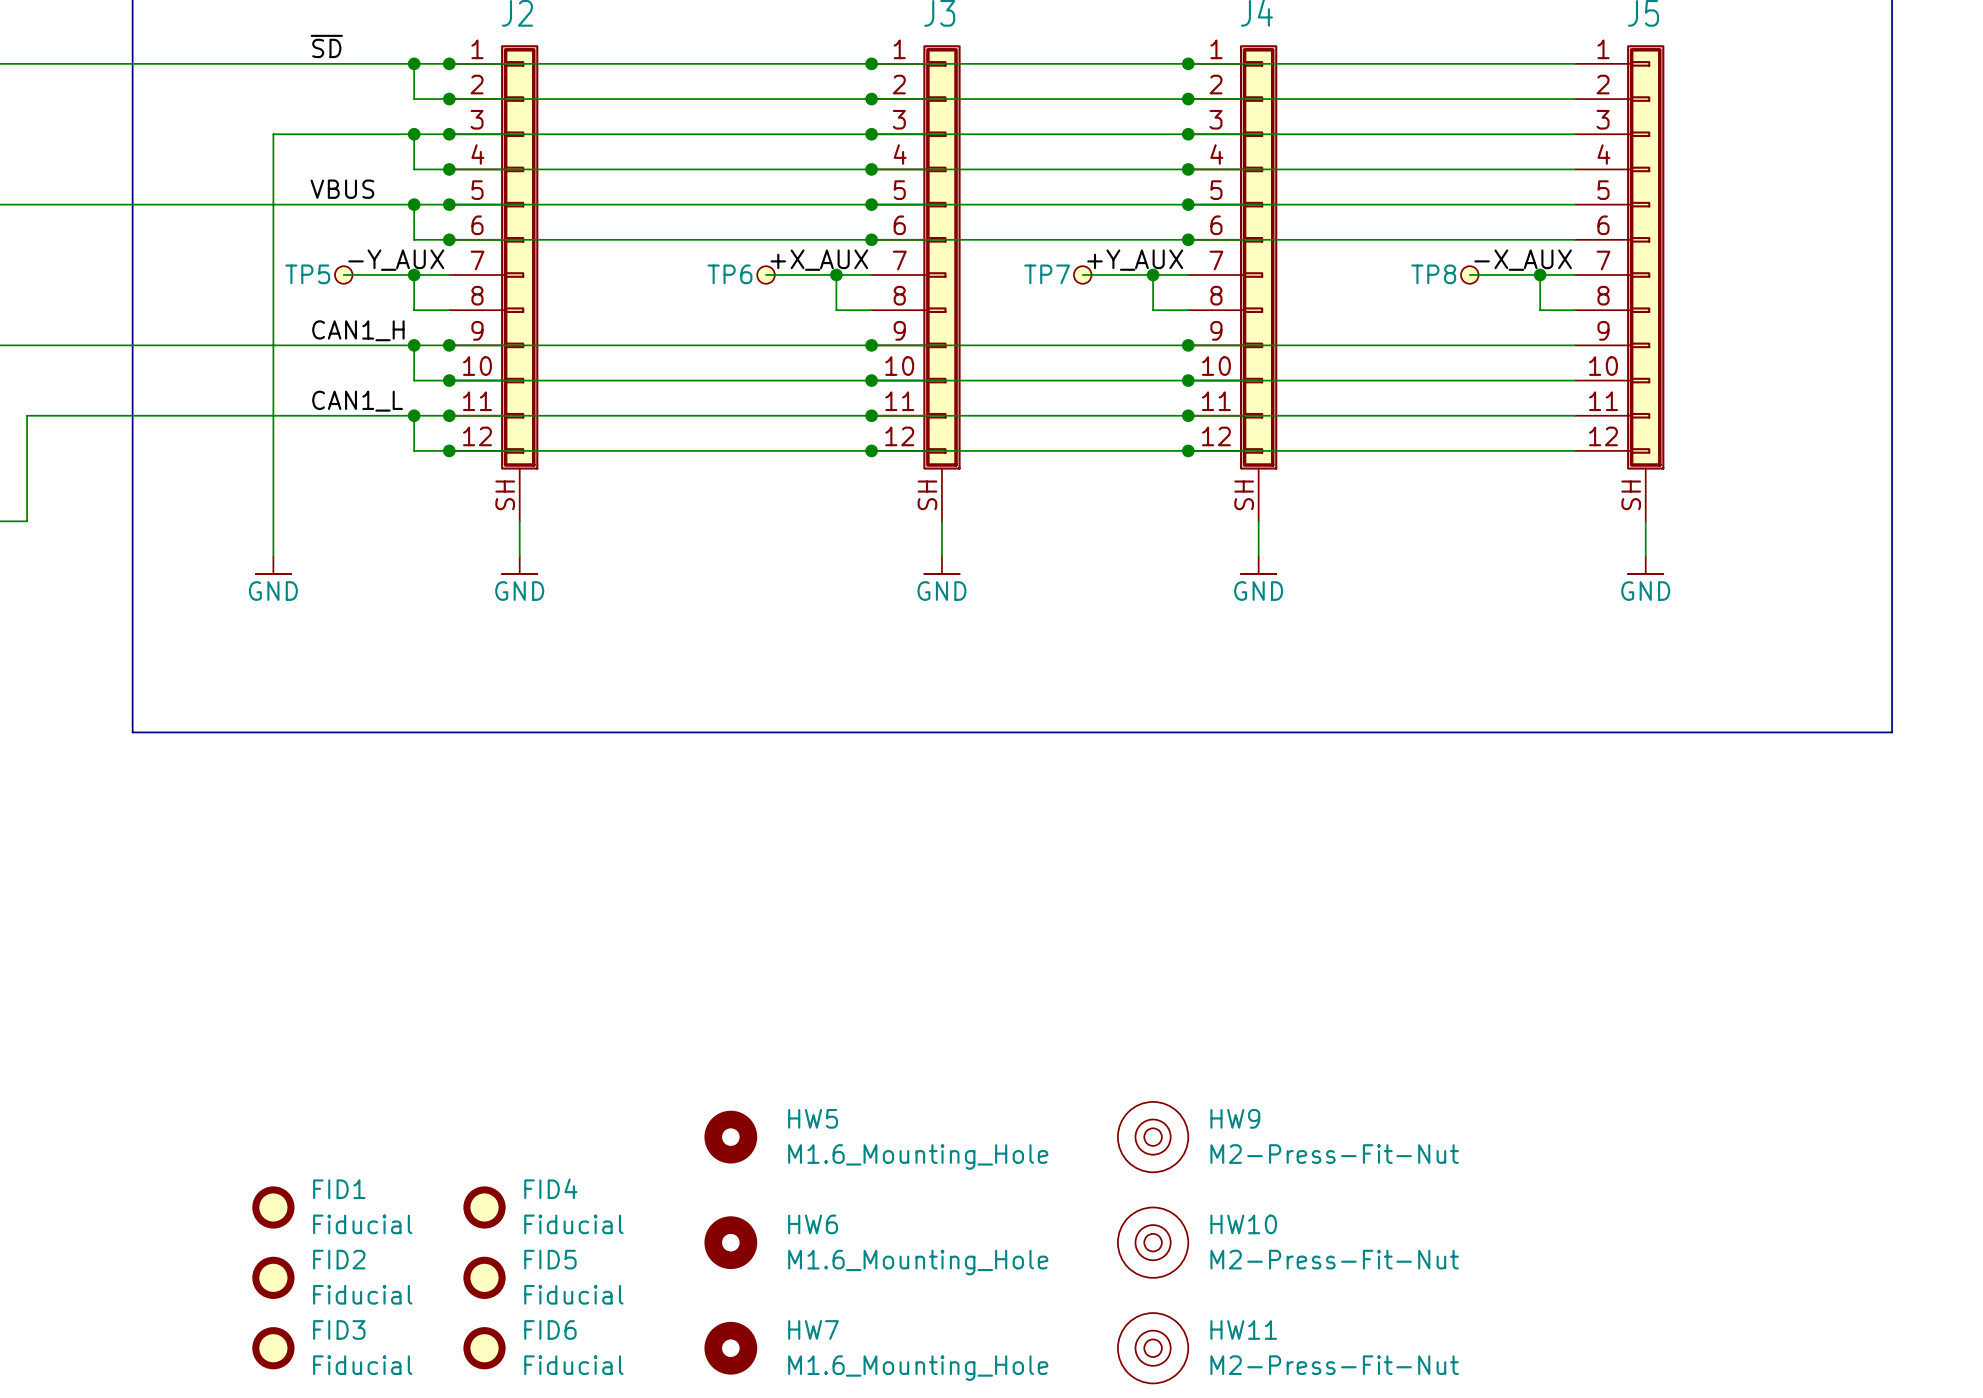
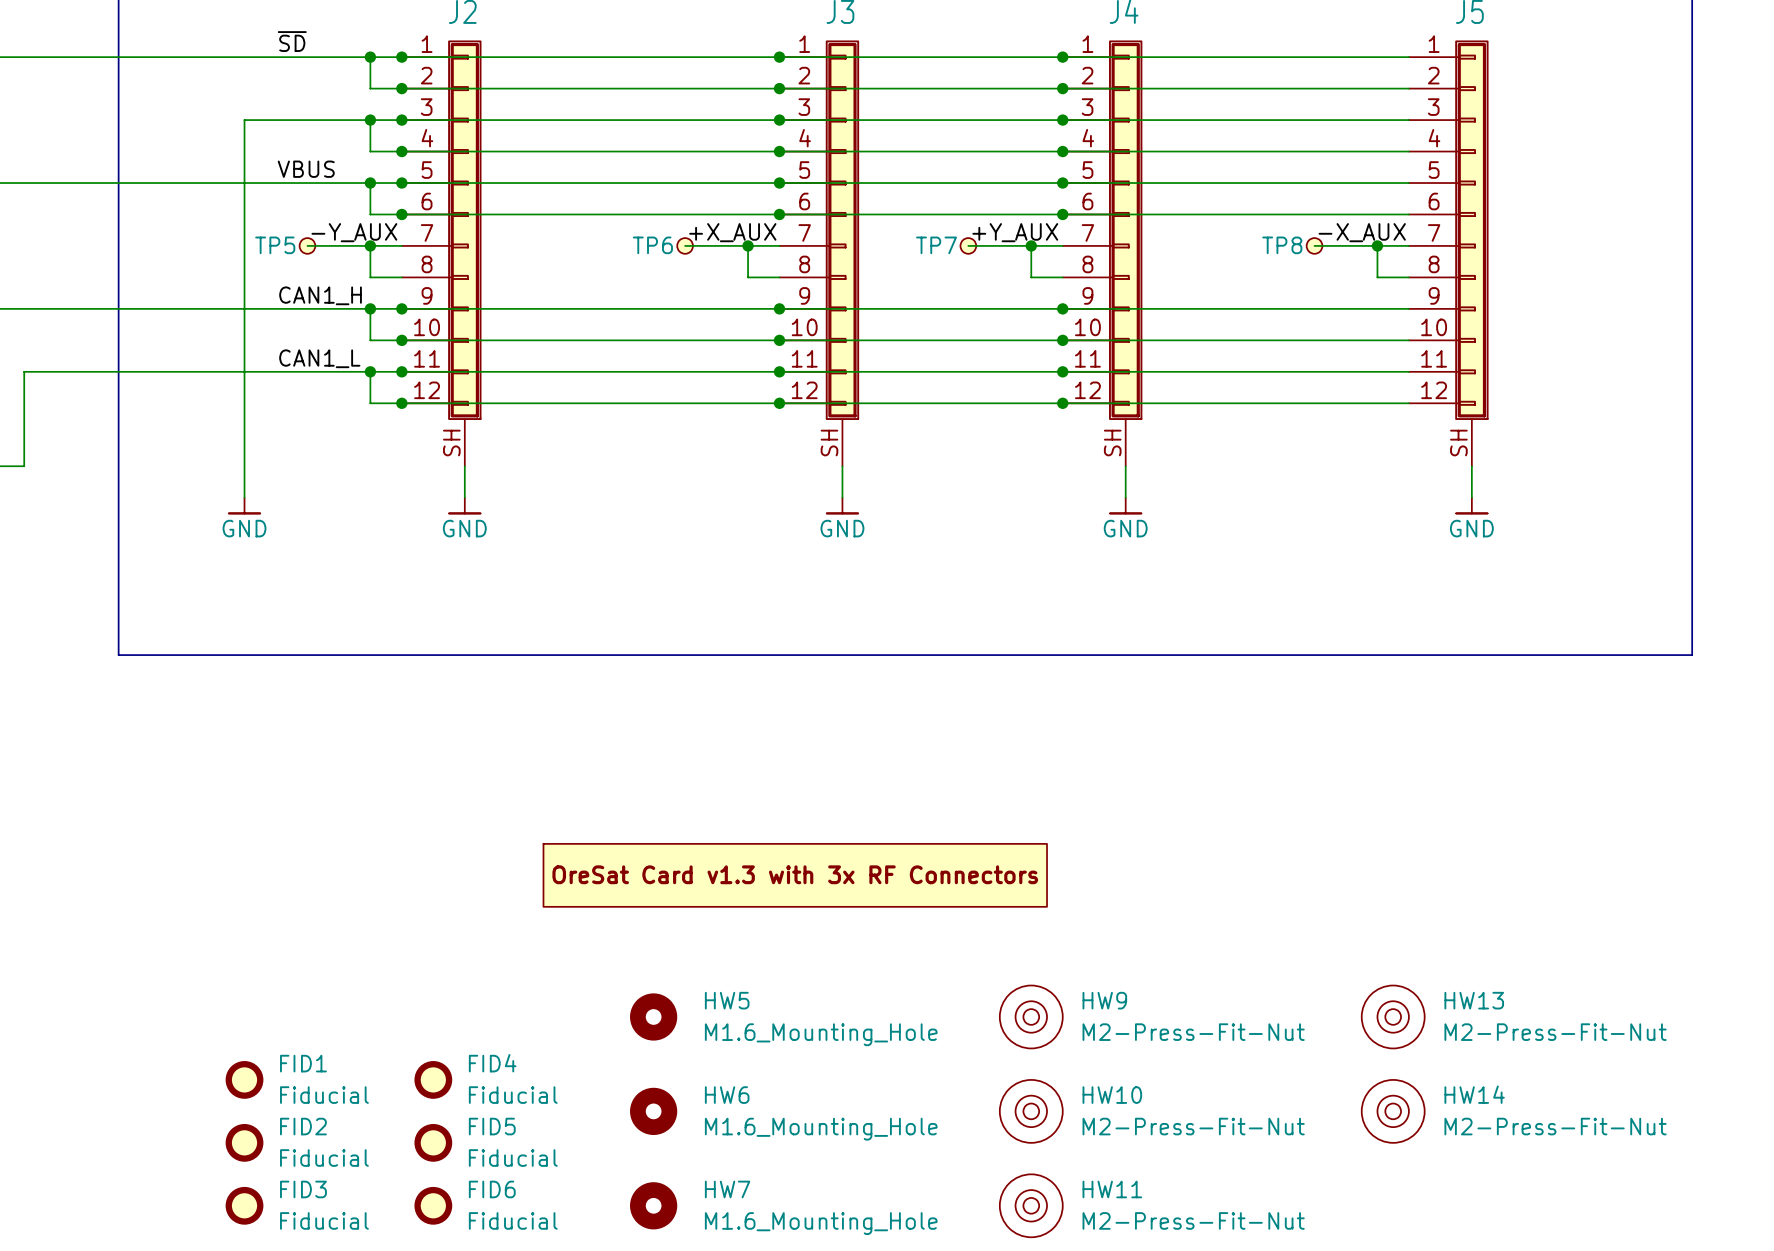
part: none -> (795, 875)
HW13: none -> M2-Press-Fit-Nut (1393, 1016)
HW14: none -> M2-Press-Fit-Nut (1393, 1111)

